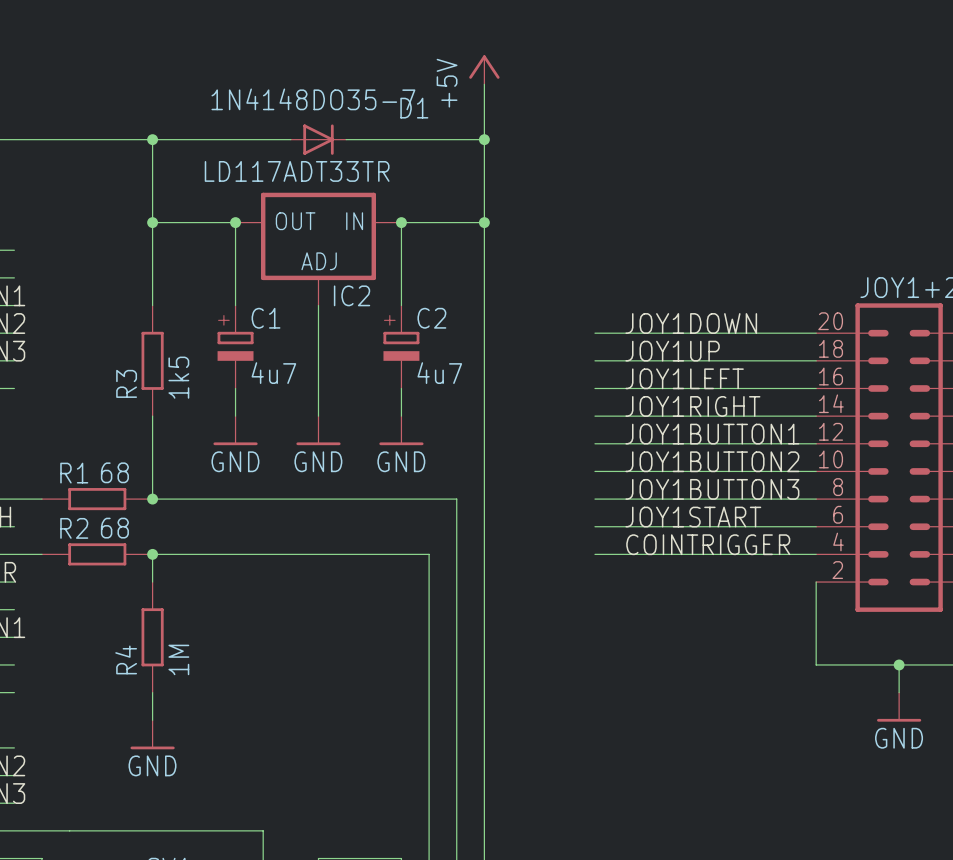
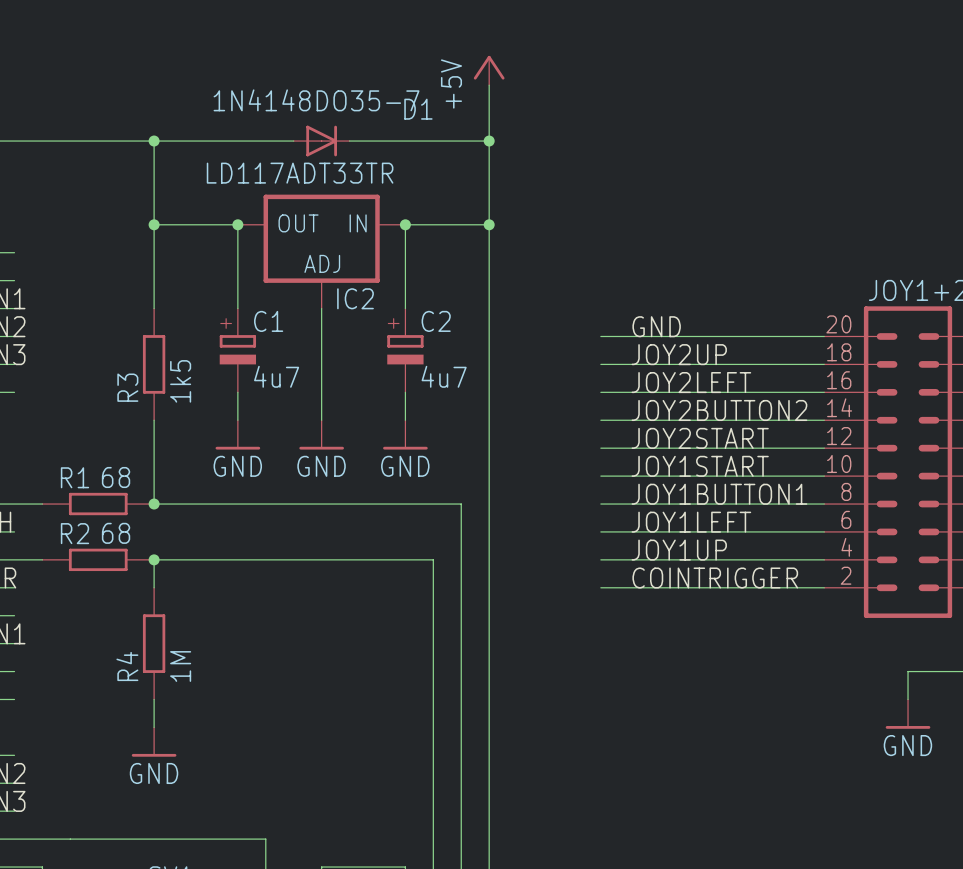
label: JOY1DOWN (691, 323) -> GND (656, 326)
label: JOY1UP (672, 351) -> JOY2UP (679, 354)
label: JOY1LEFT (684, 378) -> JOY2LEFT (691, 382)
label: JOY1RIGHT (692, 406) -> JOY2BUTTON2 (719, 410)
label: JOY1BUTTON1 (712, 434) -> JOY2START (700, 438)
label: JOY1BUTTON2 (712, 461) -> JOY1START (700, 466)
label: JOY1BUTTON3 (712, 489) -> JOY1BUTTON1 (719, 494)
label: JOY1START (693, 517) -> JOY1LEFT (691, 522)
label: COINTRIGGER (708, 544) -> JOY1UP (679, 550)
label: none -> COINTRIGGER (715, 578)
wire: (816, 582) (816, 664) (899, 664) -> (824, 587) (600, 587)
junction: (899, 664) -> none

